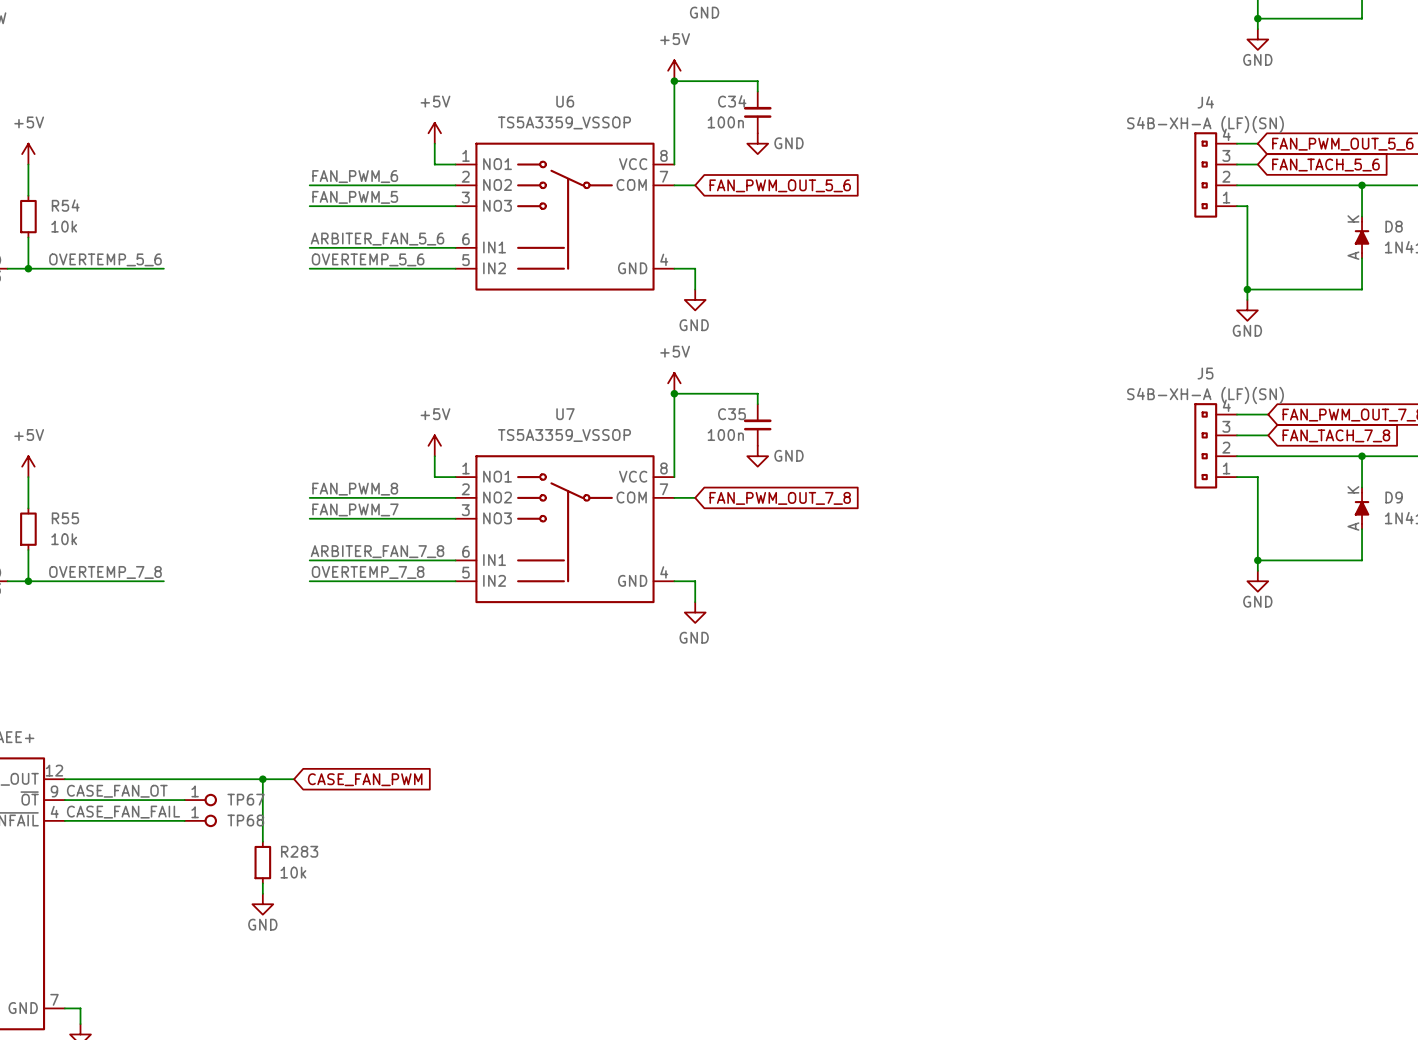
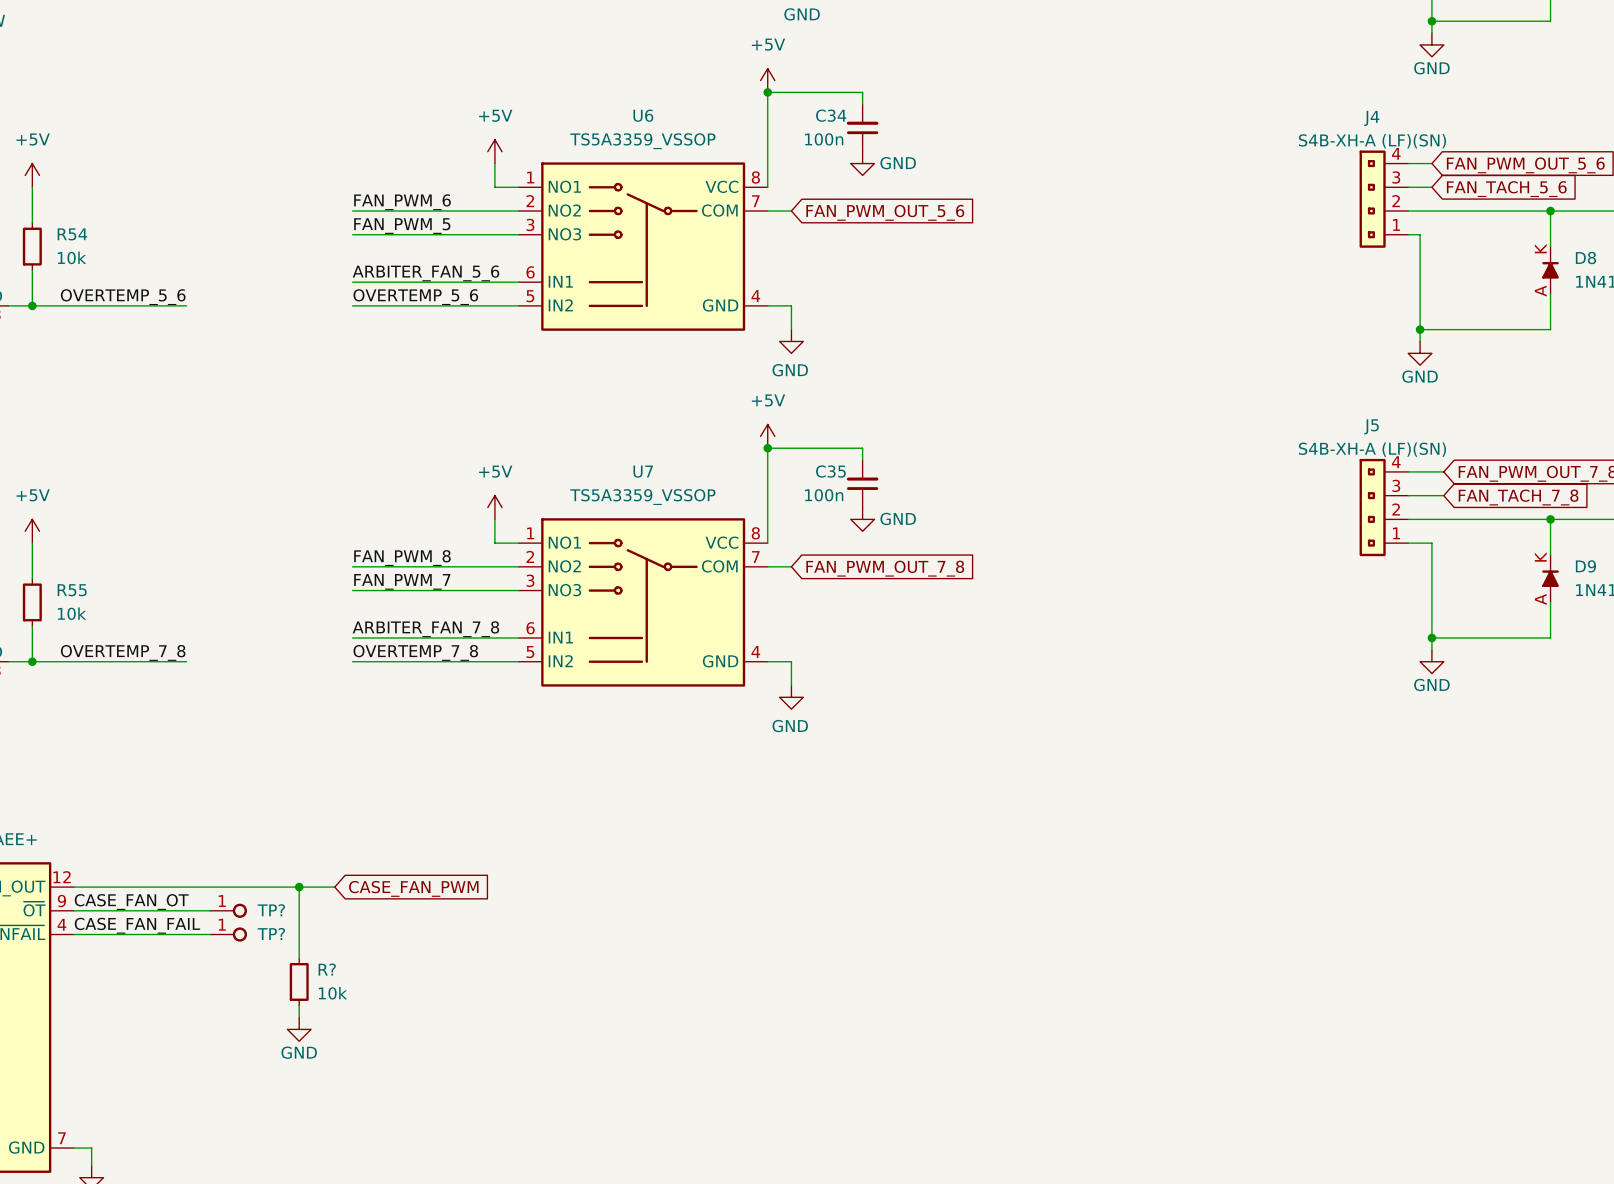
TP67 name: TP67 (246, 799) -> TP? (271, 910)
TP68 name: TP68 (245, 820) -> TP? (271, 933)
R283 name: R283 (299, 851) -> R? (327, 969)

